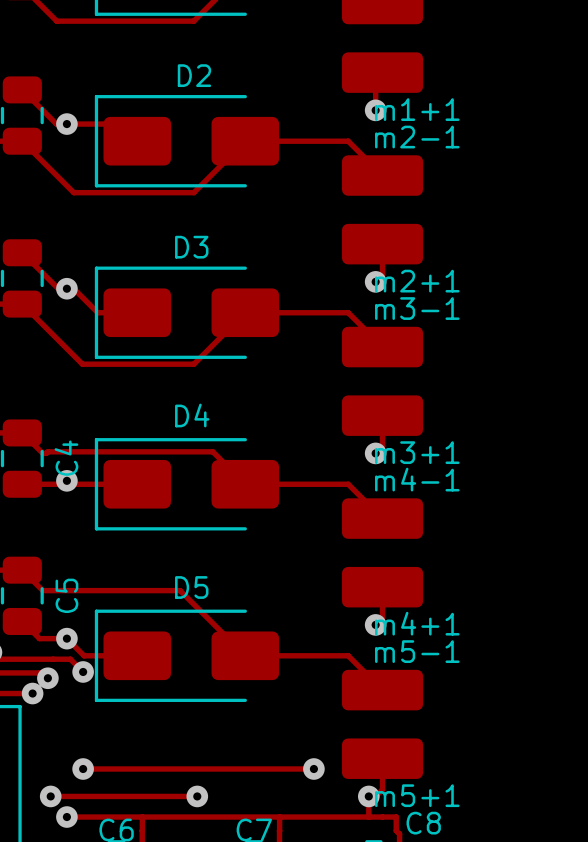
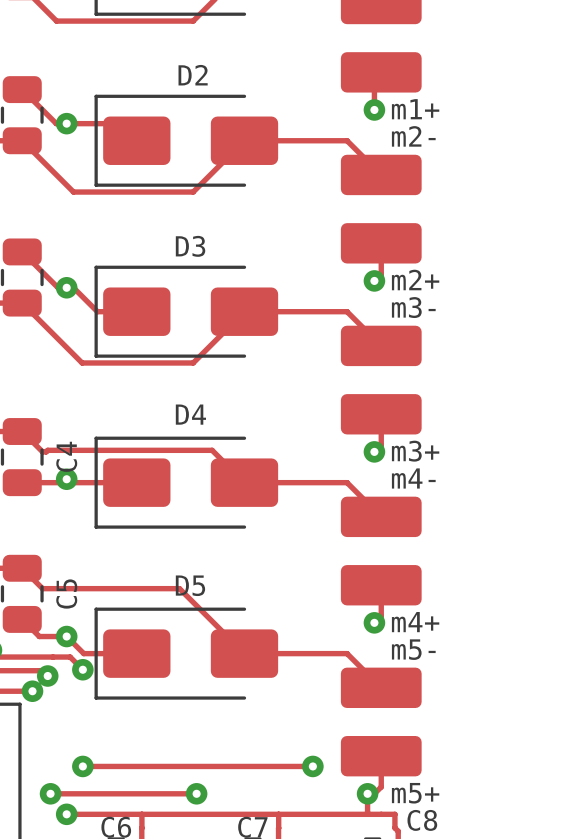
m1+1 name: m1+1 (417, 109) -> m1+ (415, 109)
m2-1 name: m2-1 (417, 137) -> m2- (413, 136)
m2+1 name: m2+1 (417, 281) -> m2+ (415, 279)
m3-1 name: m3-1 (417, 308) -> m3- (413, 307)
m3+1 name: m3+1 (417, 452) -> m3+ (415, 451)
m4-1 name: m4-1 (417, 479) -> m4- (413, 478)
m4+1 name: m4+1 (417, 623) -> m4+ (415, 622)
m5-1 name: m5-1 (417, 651) -> m5- (413, 649)
m5+1 name: m5+1 (417, 795) -> m5+ (415, 793)

